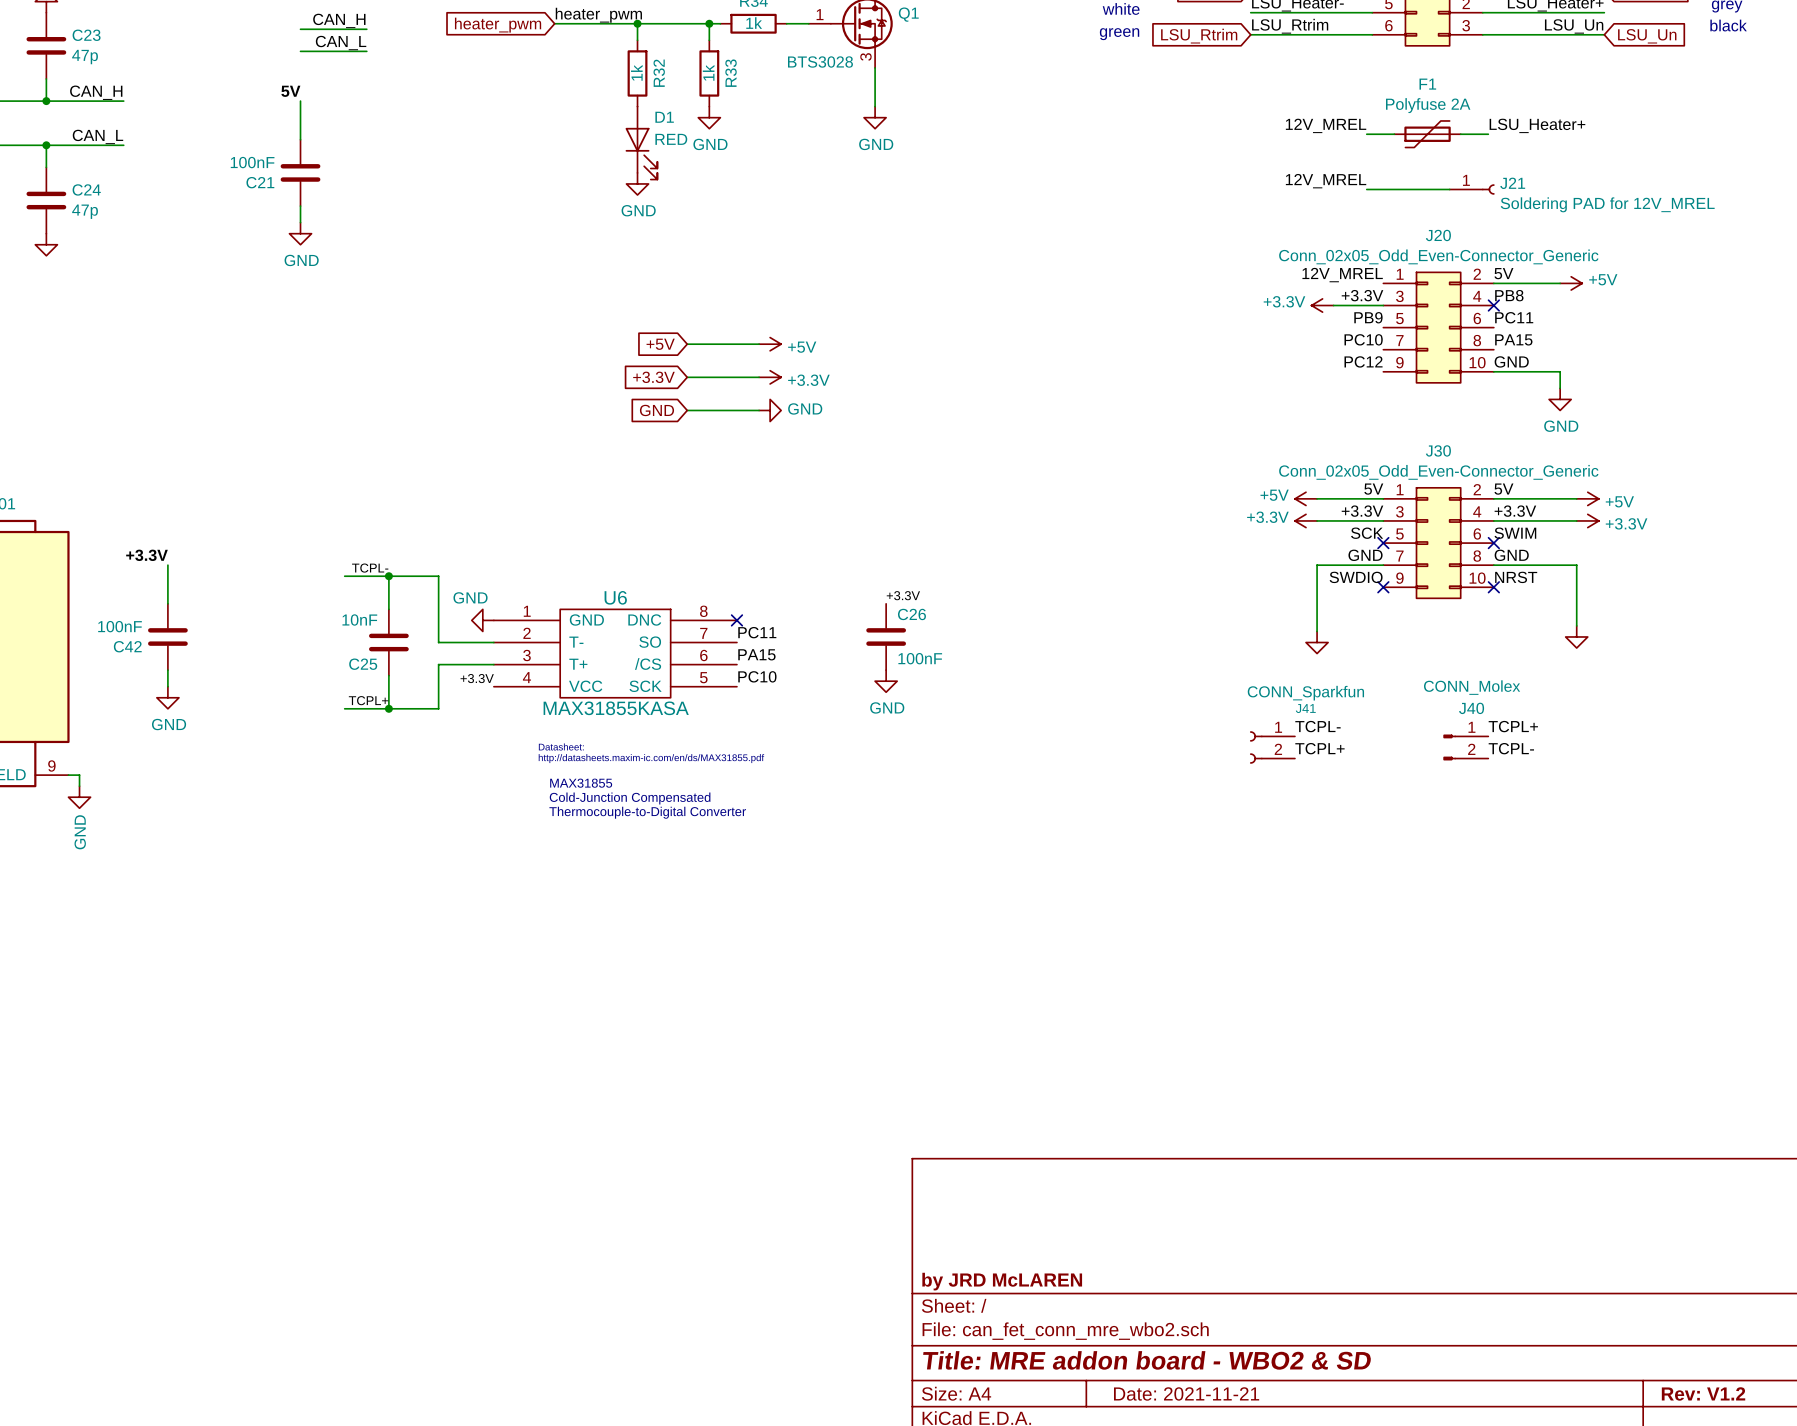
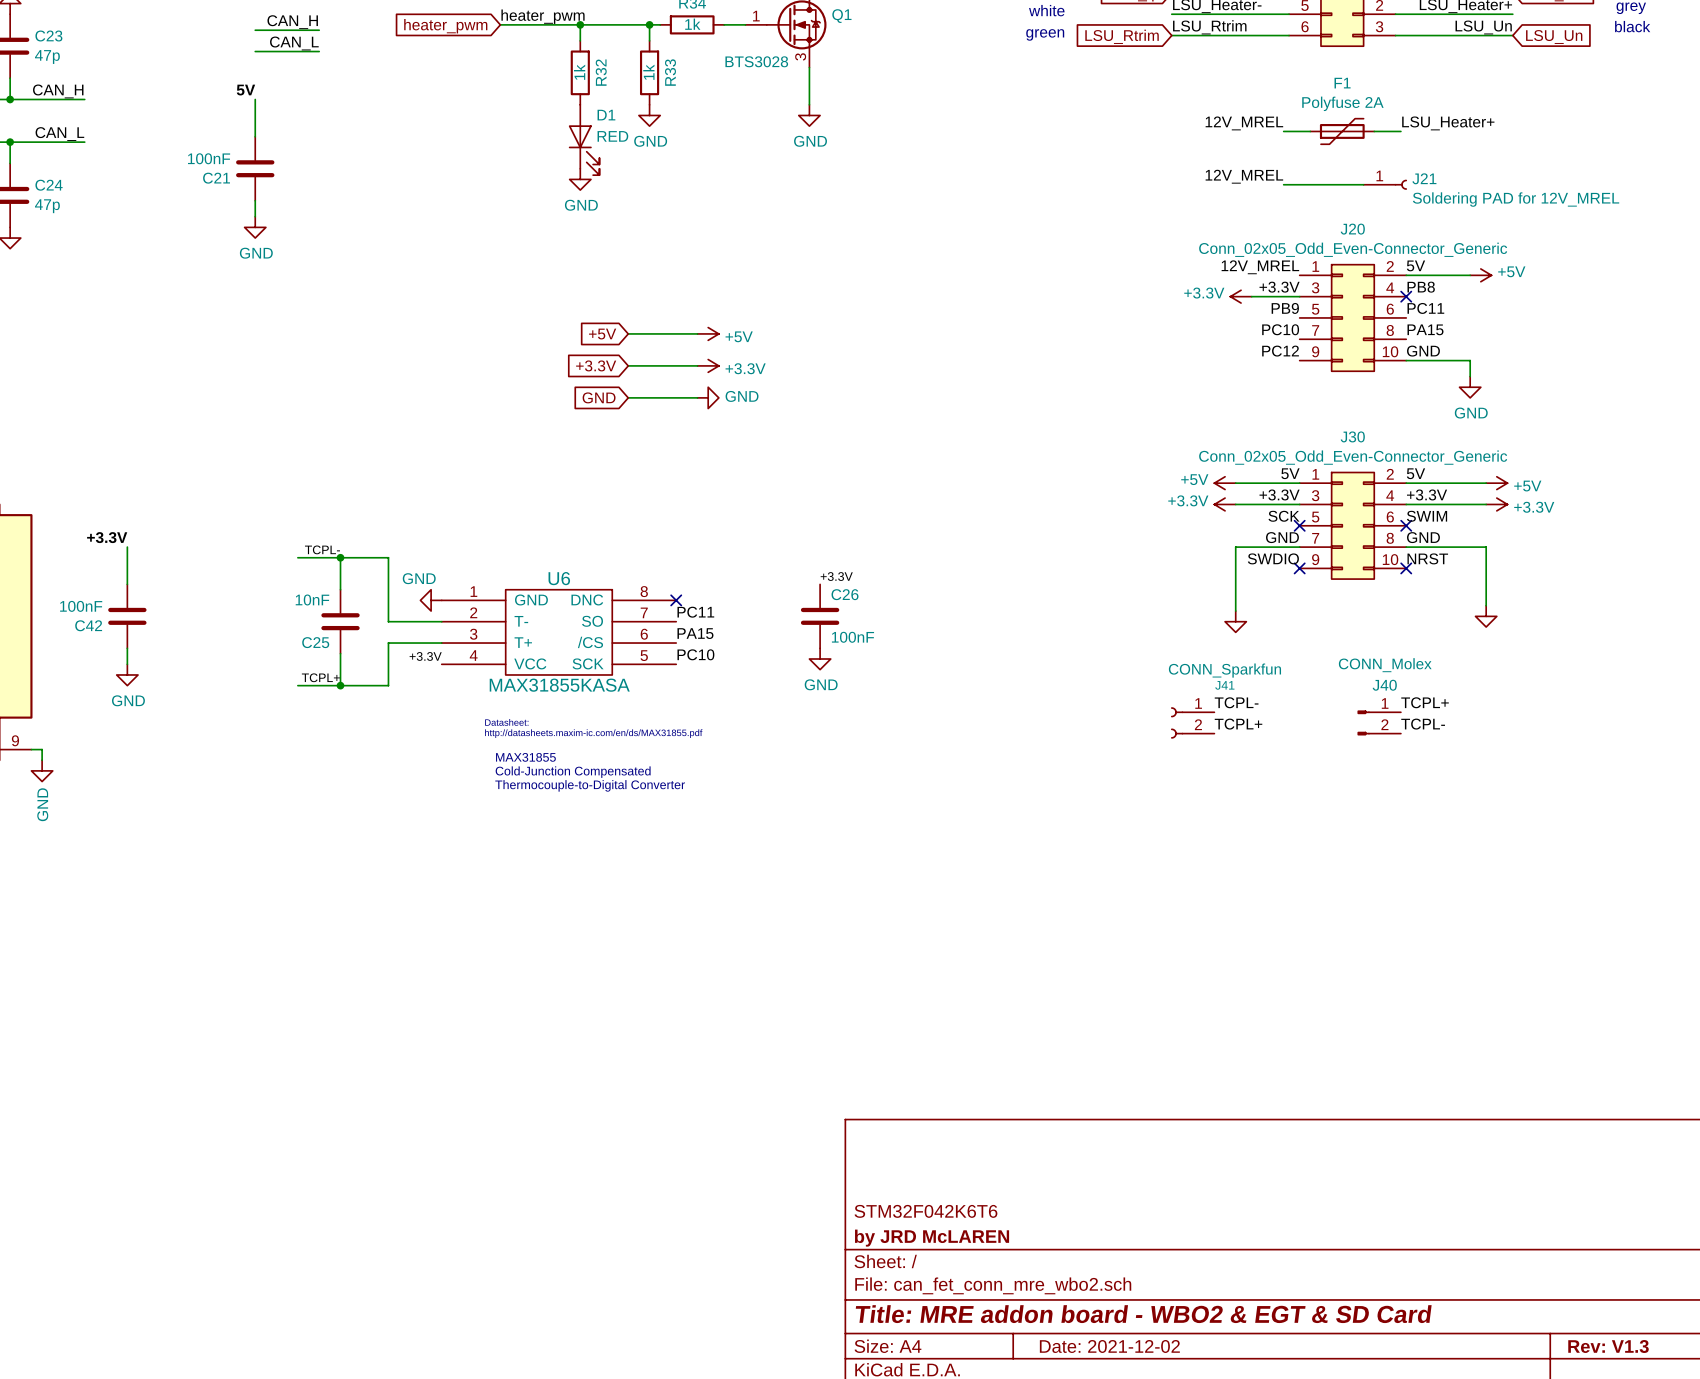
title block: none -> STM32F042K6T6 (925, 1211)
title block: Title: MRE addon board - WBO2 & SD (1147, 1360) -> Title: MRE addon board - WBO2 & EGT & SD Card (1143, 1314)
title block: Date: 2021-11-21 (1186, 1393) -> Date: 2021-12-02 (1109, 1346)
title block: Rev: V1.2 (1703, 1393) -> Rev: V1.3 (1608, 1346)

